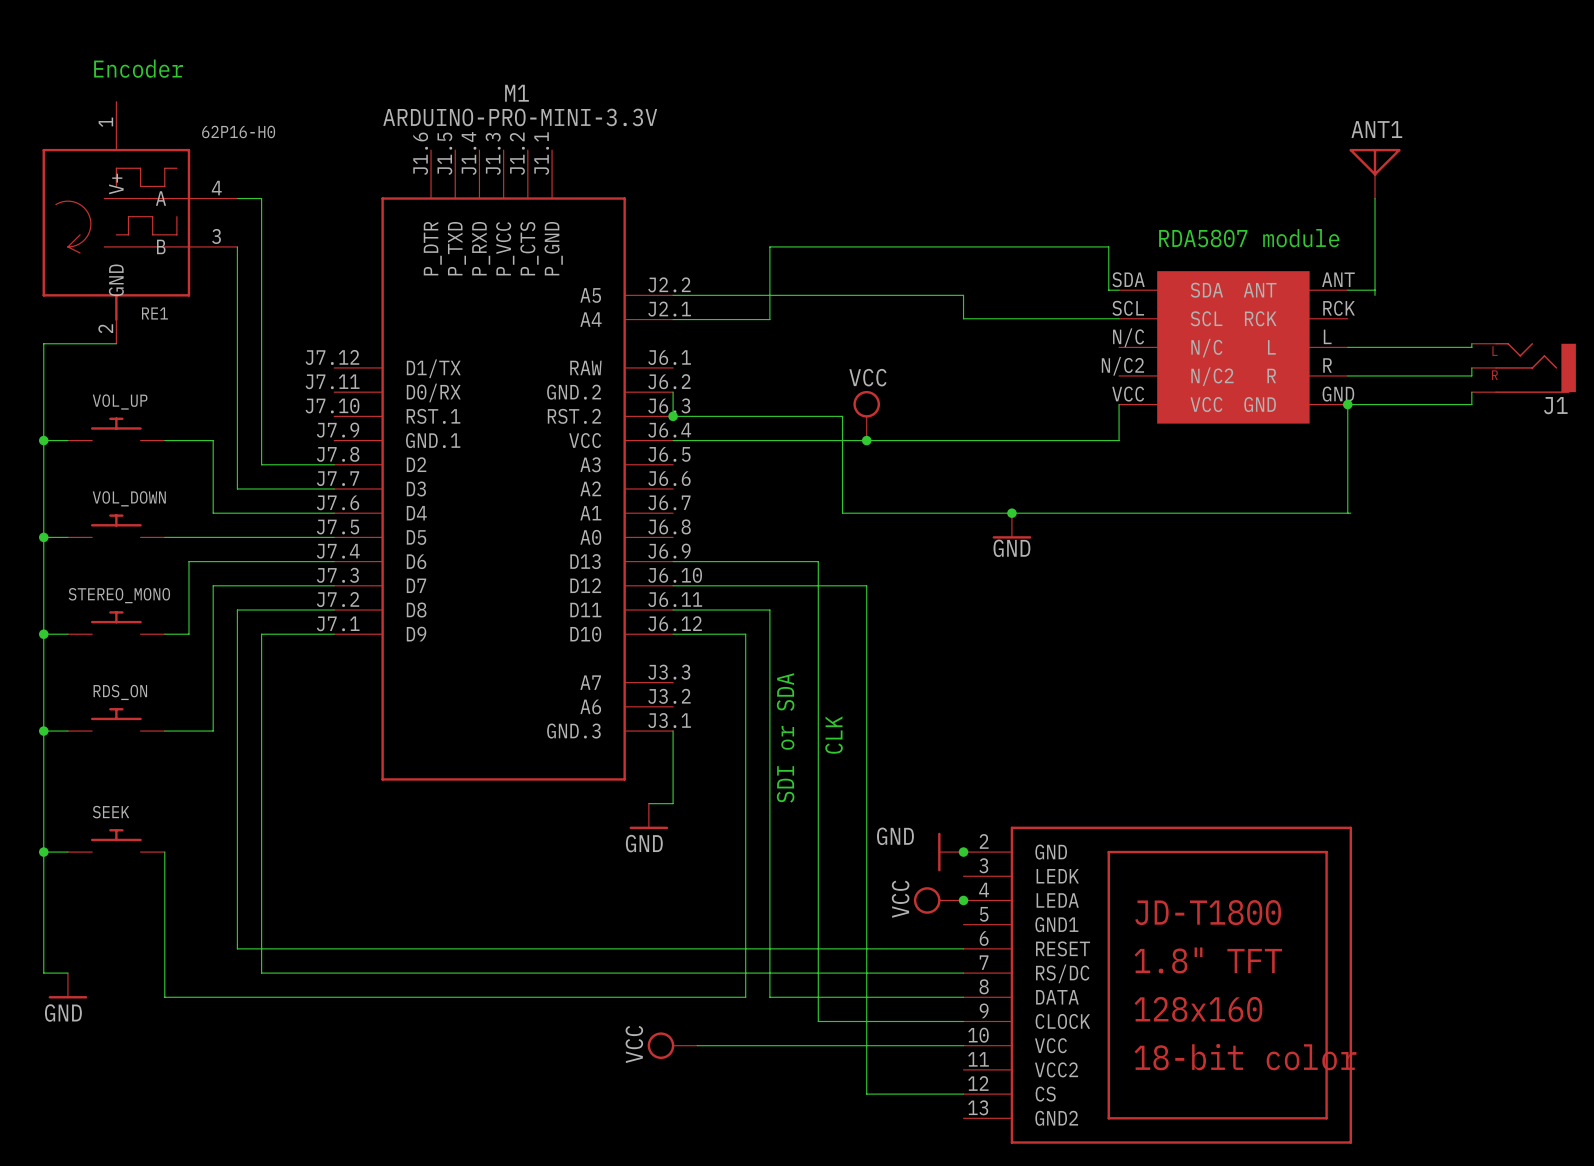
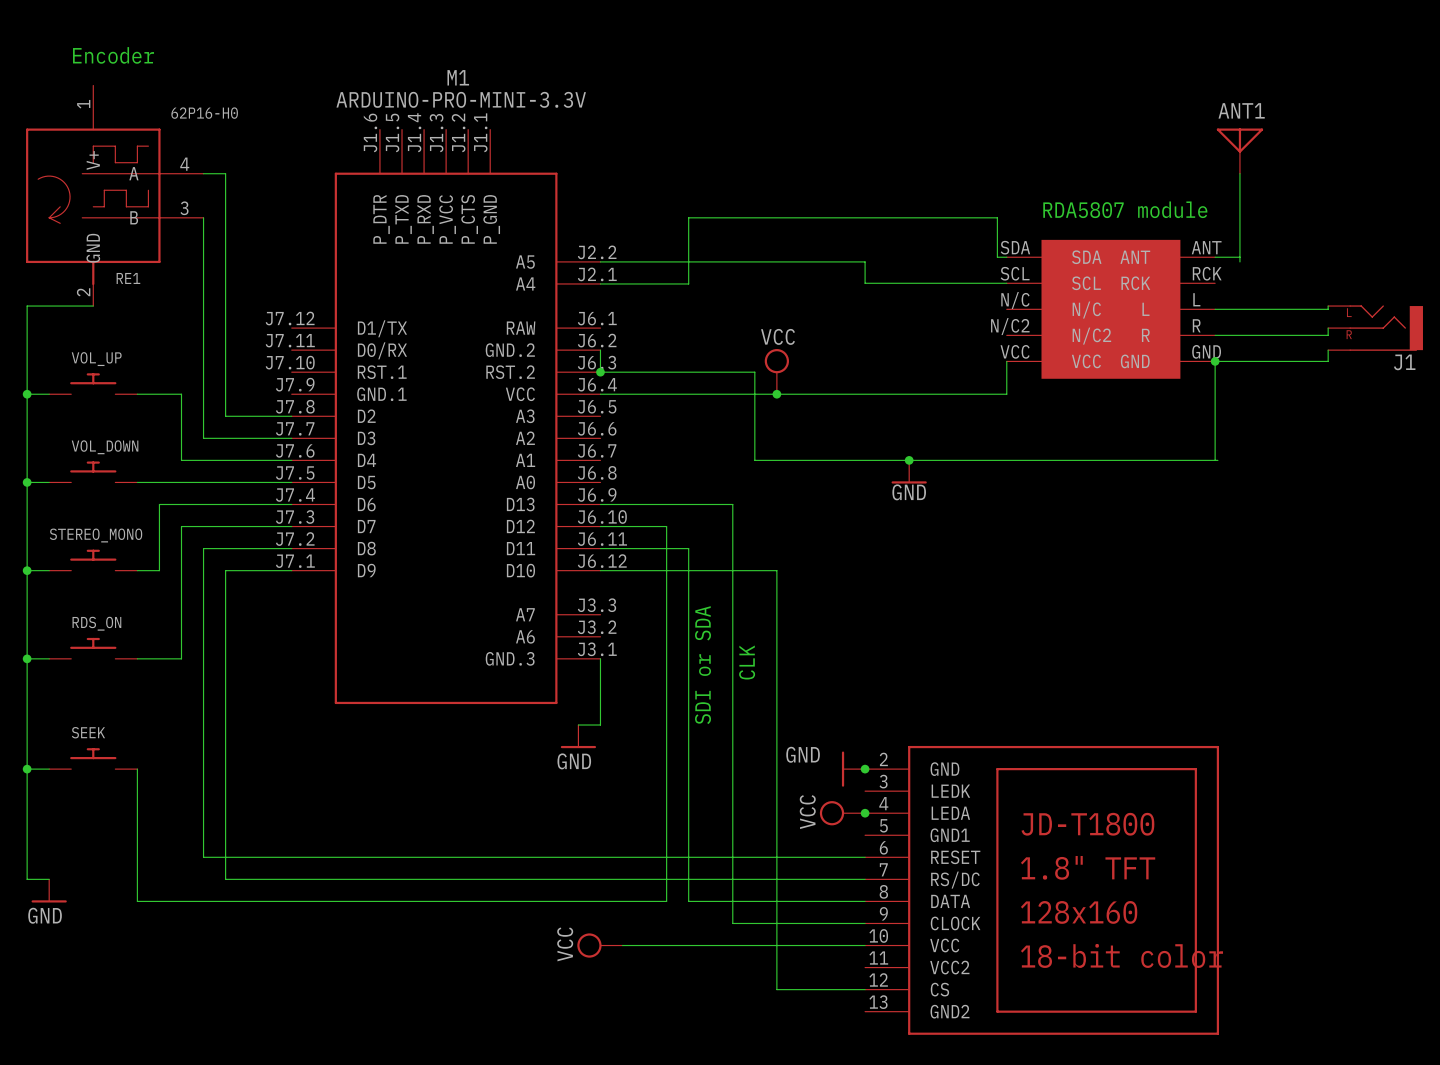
wire: (745, 585) (866, 585) (866, 634) -> (666, 526) (666, 570) (776, 570)

